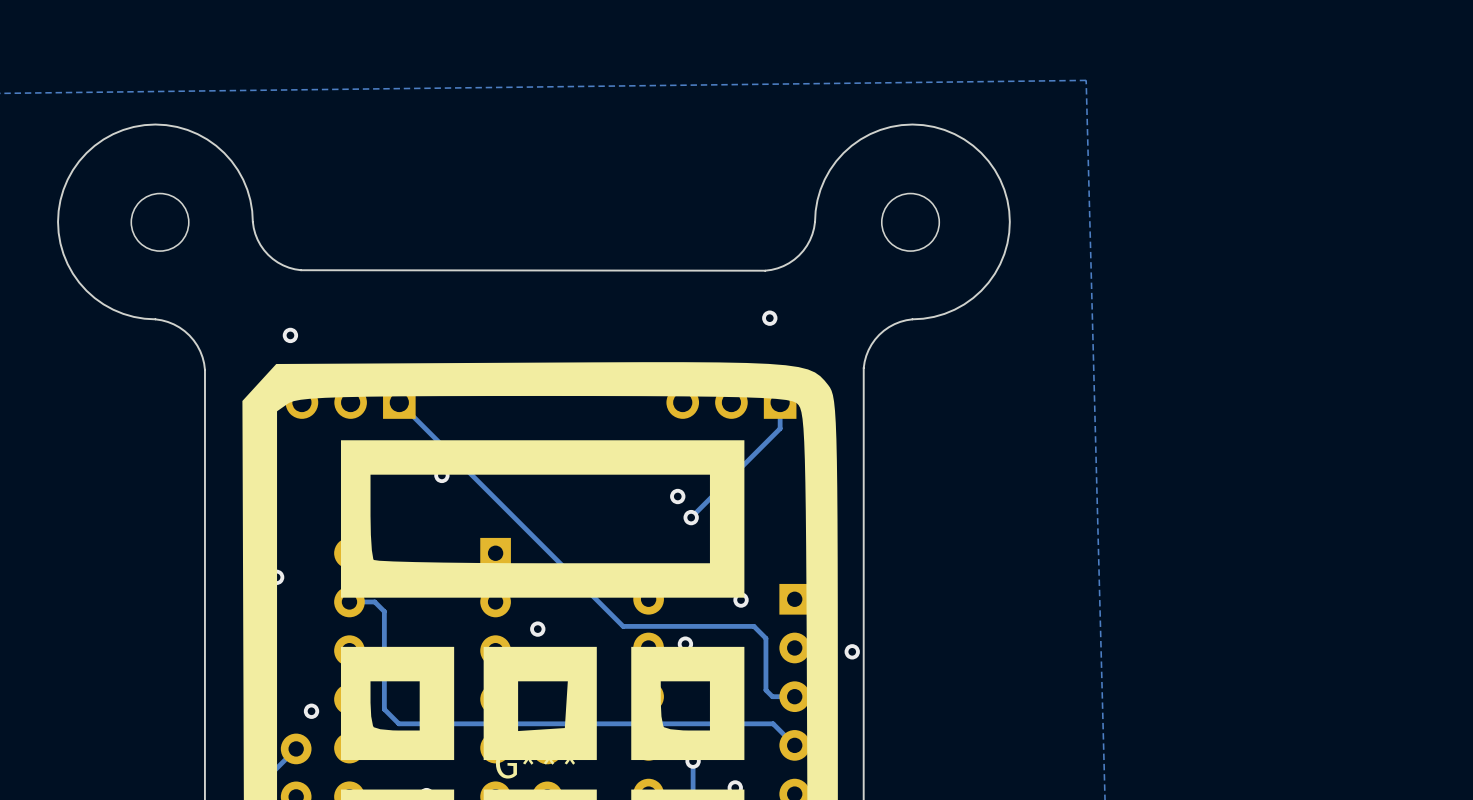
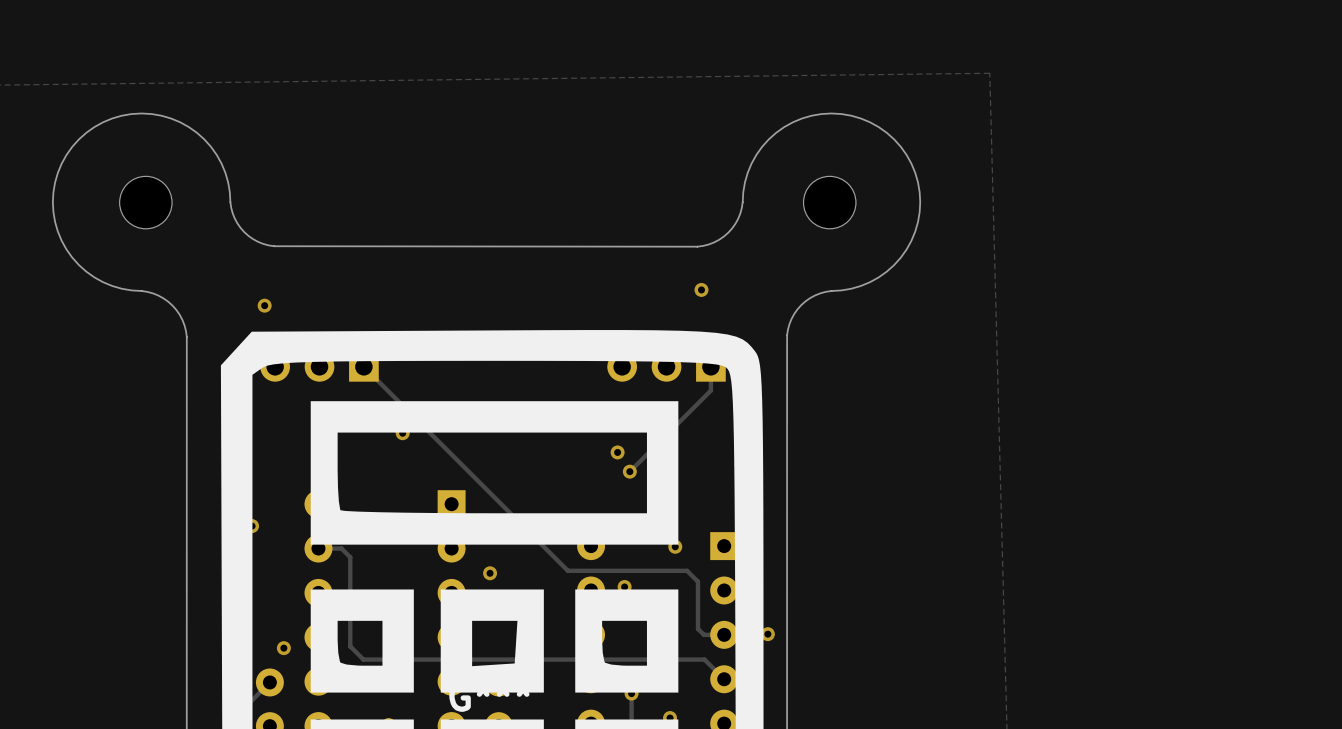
via position: (852, 651) -> (767, 634)

